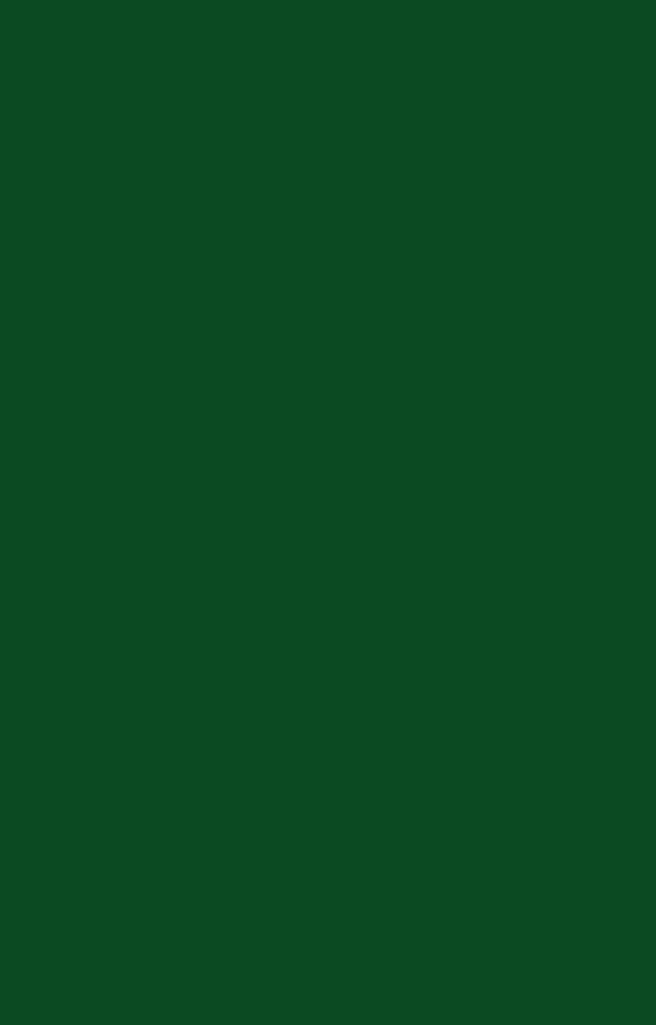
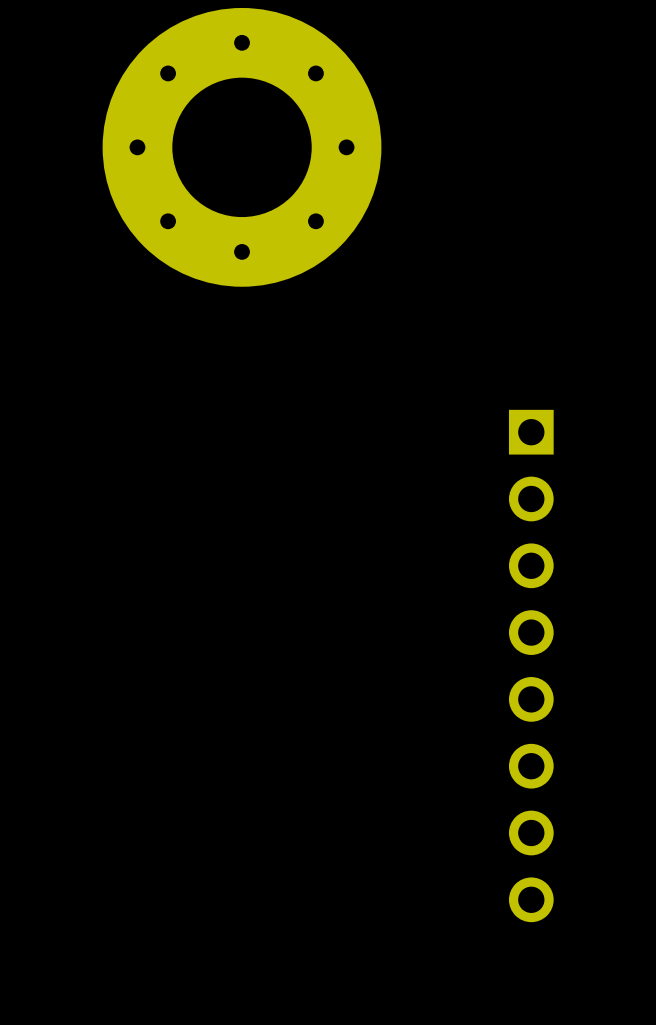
part: none -> (242, 147)
part: none -> (531, 666)

